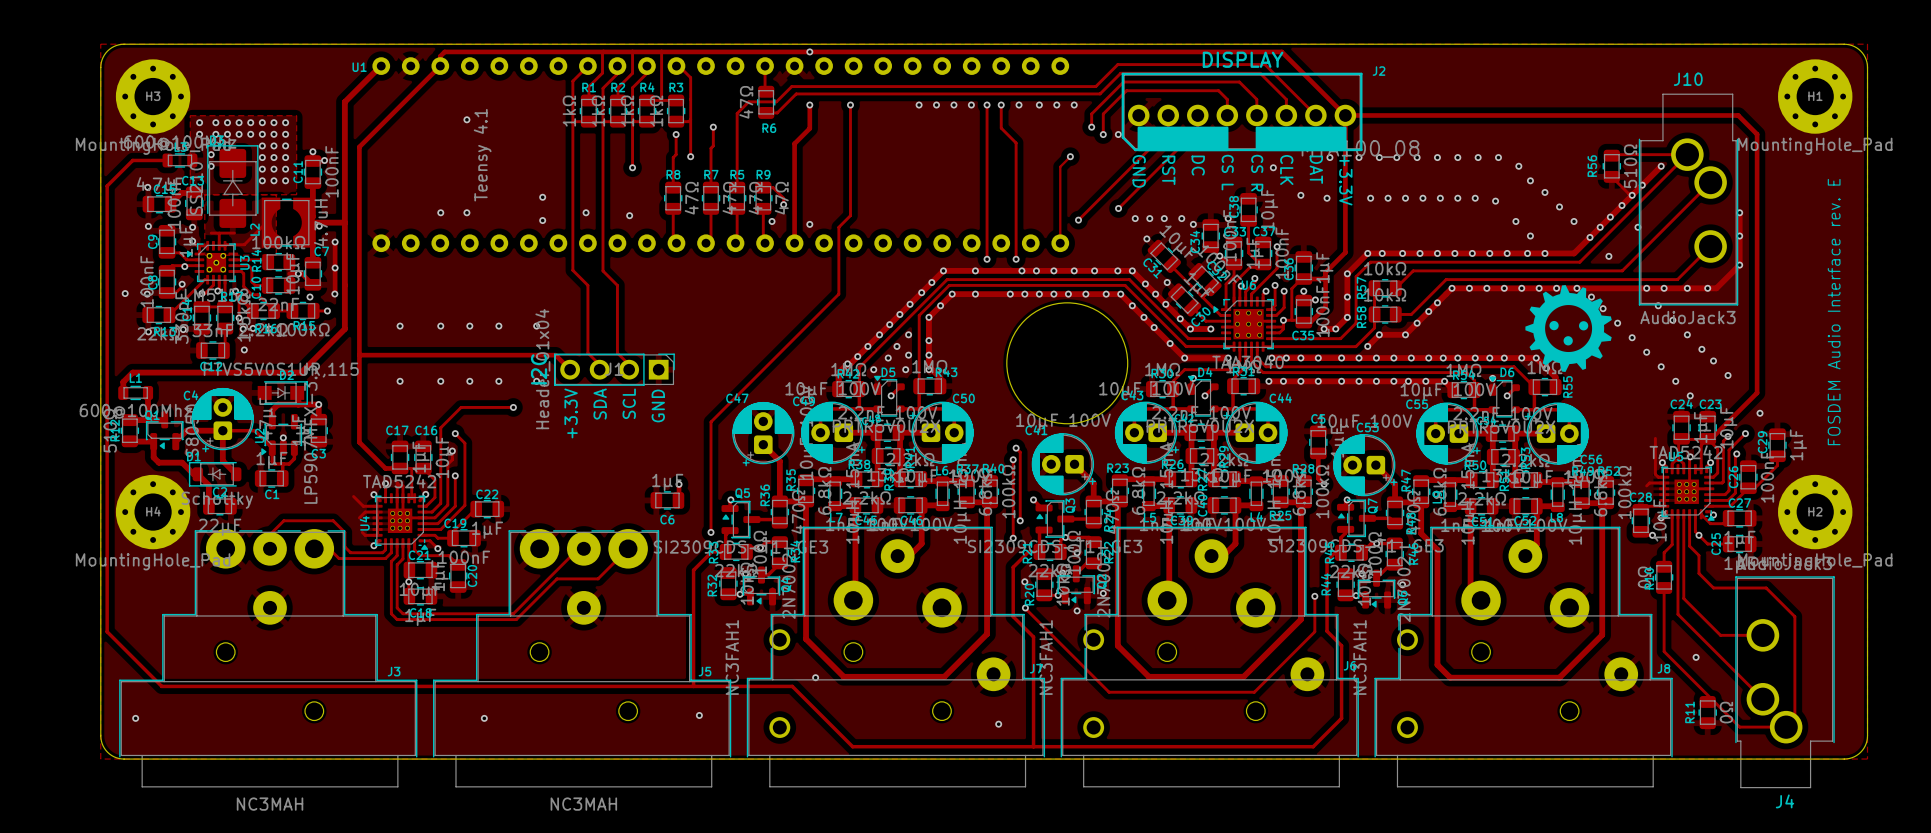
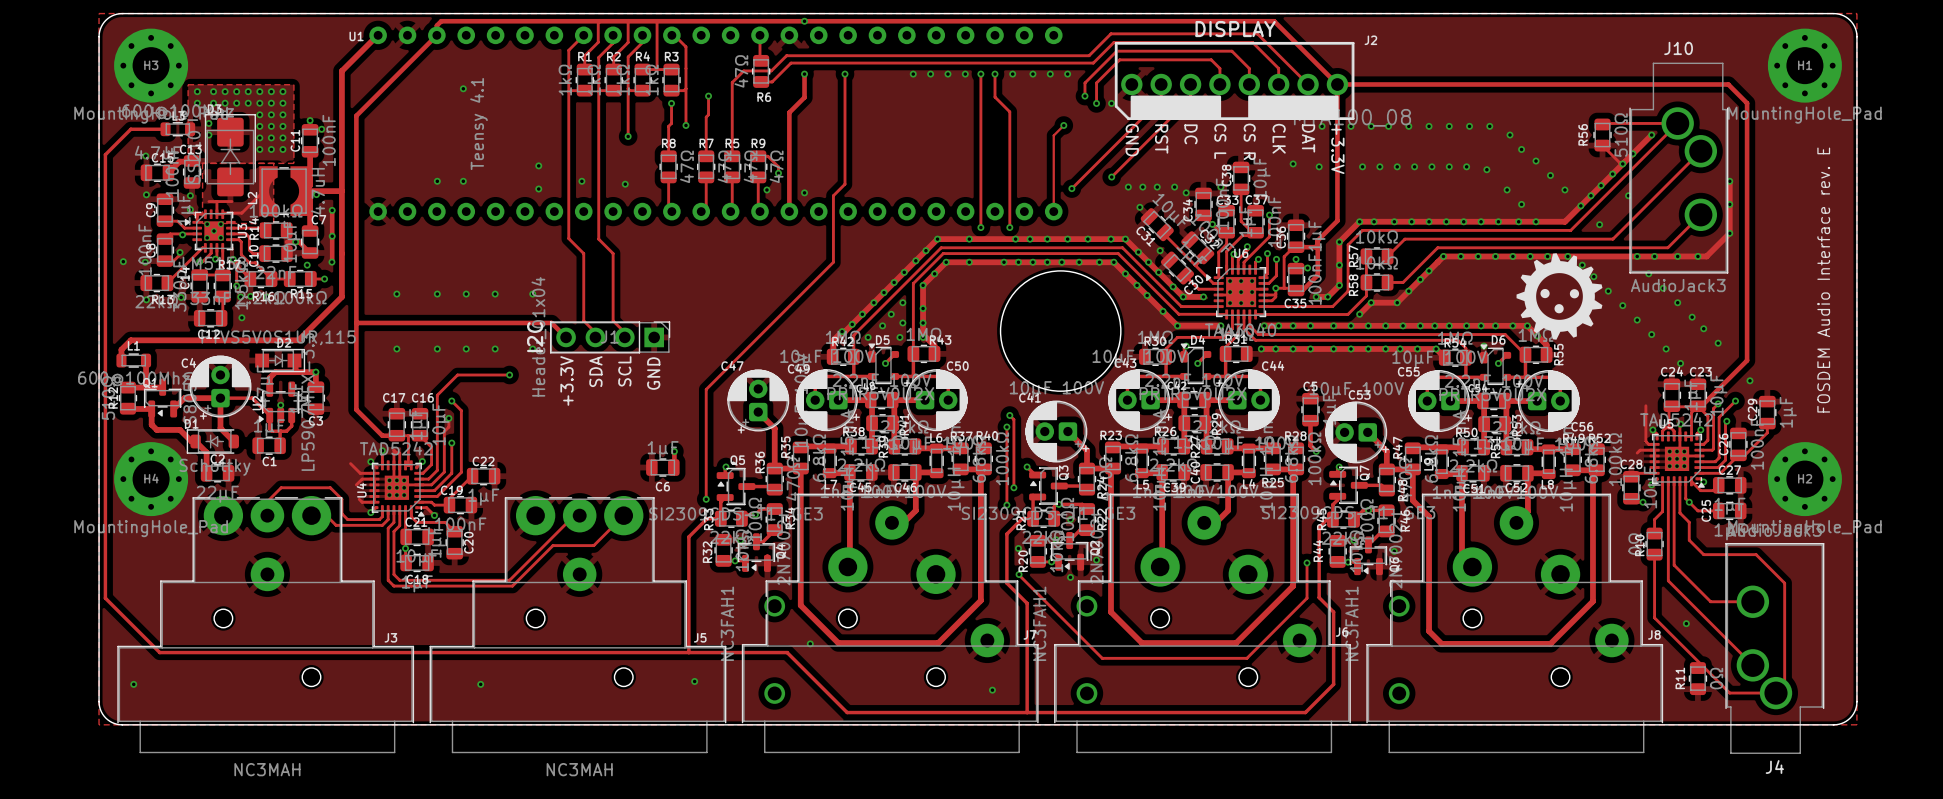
via: (1273, 167) -> none

